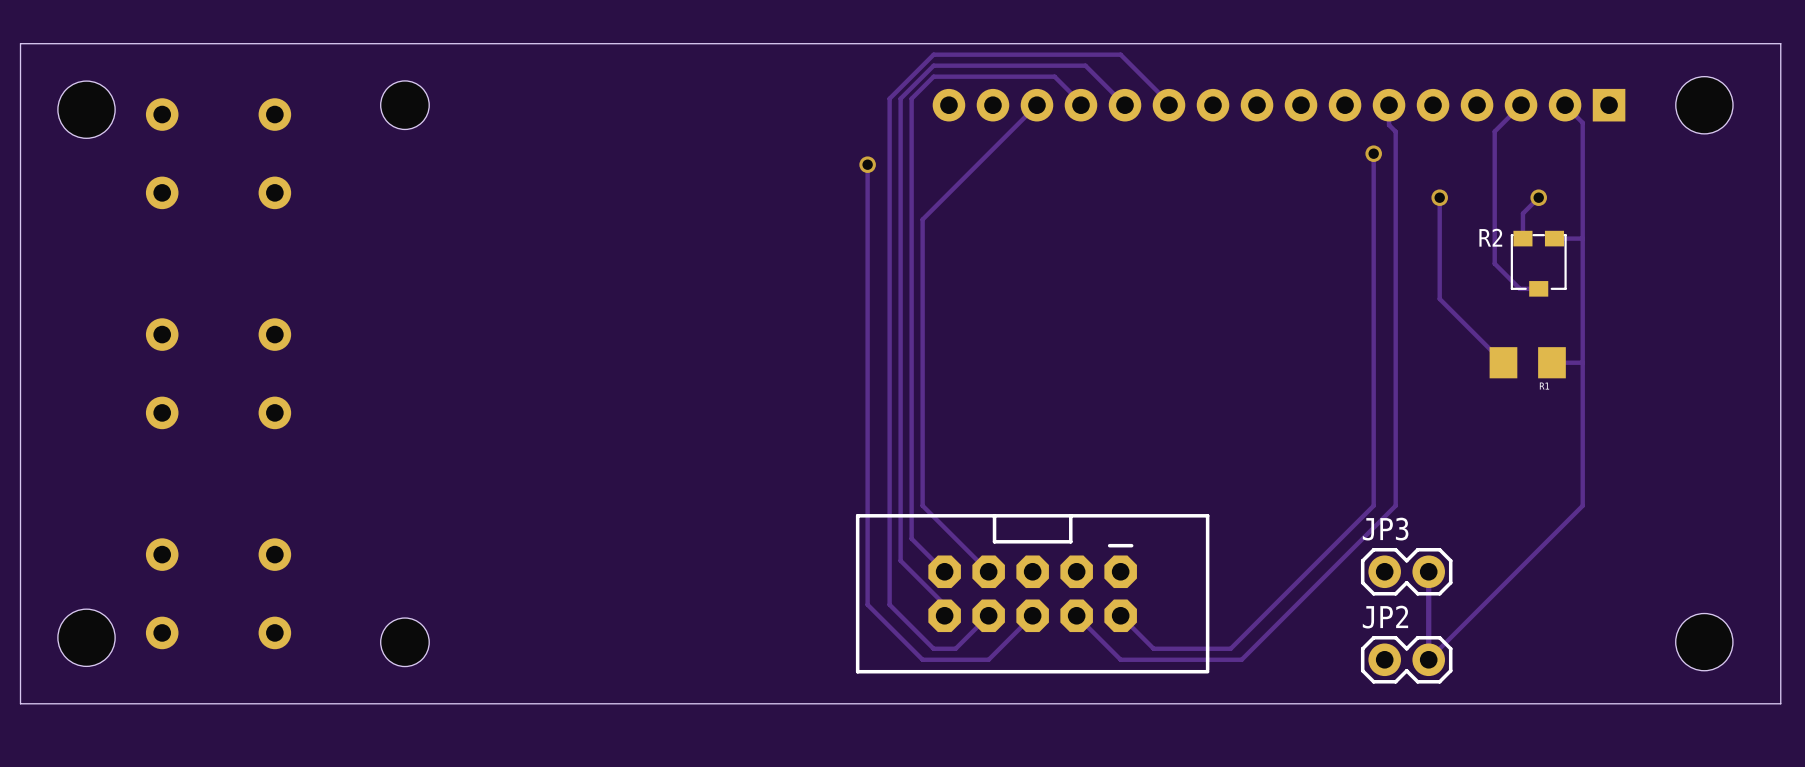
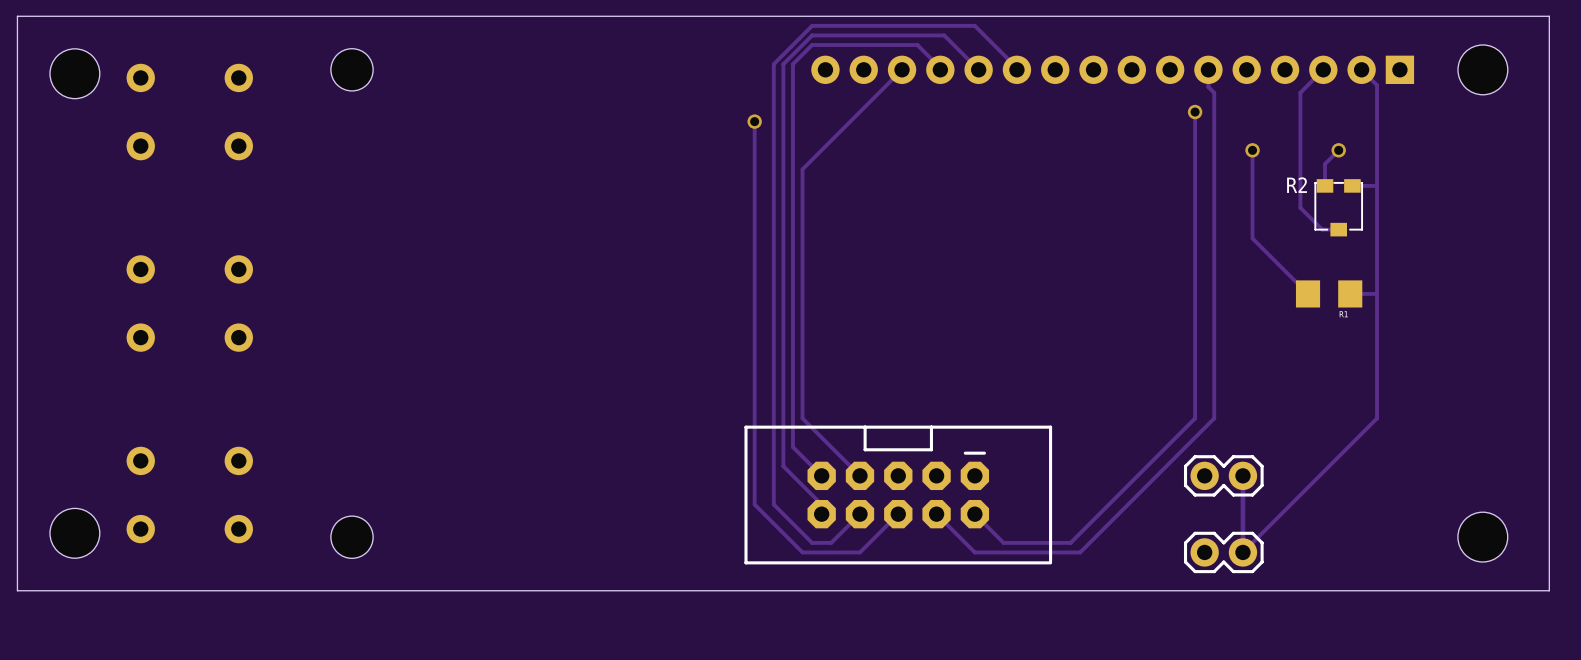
JP3 name: JP3 (1385, 529) -> none
JP2 name: JP2 (1385, 617) -> none

